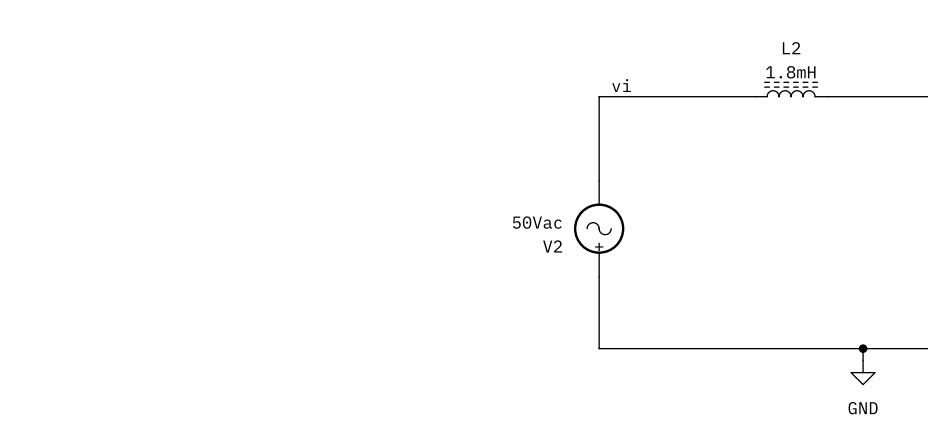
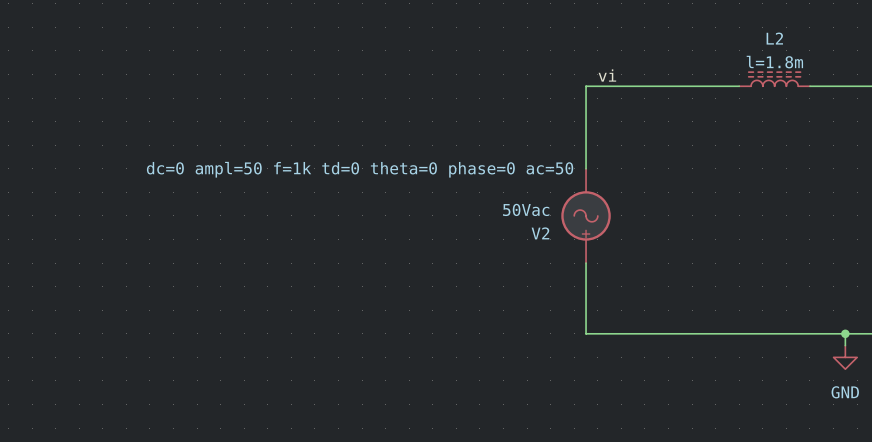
L2 value: 1.8mH (790, 72) -> l=1.8m (774, 62)
V2 text: none -> dc=0 ampl=50 f=1k td=0 theta=0 phase=0 ac=50 (360, 169)

